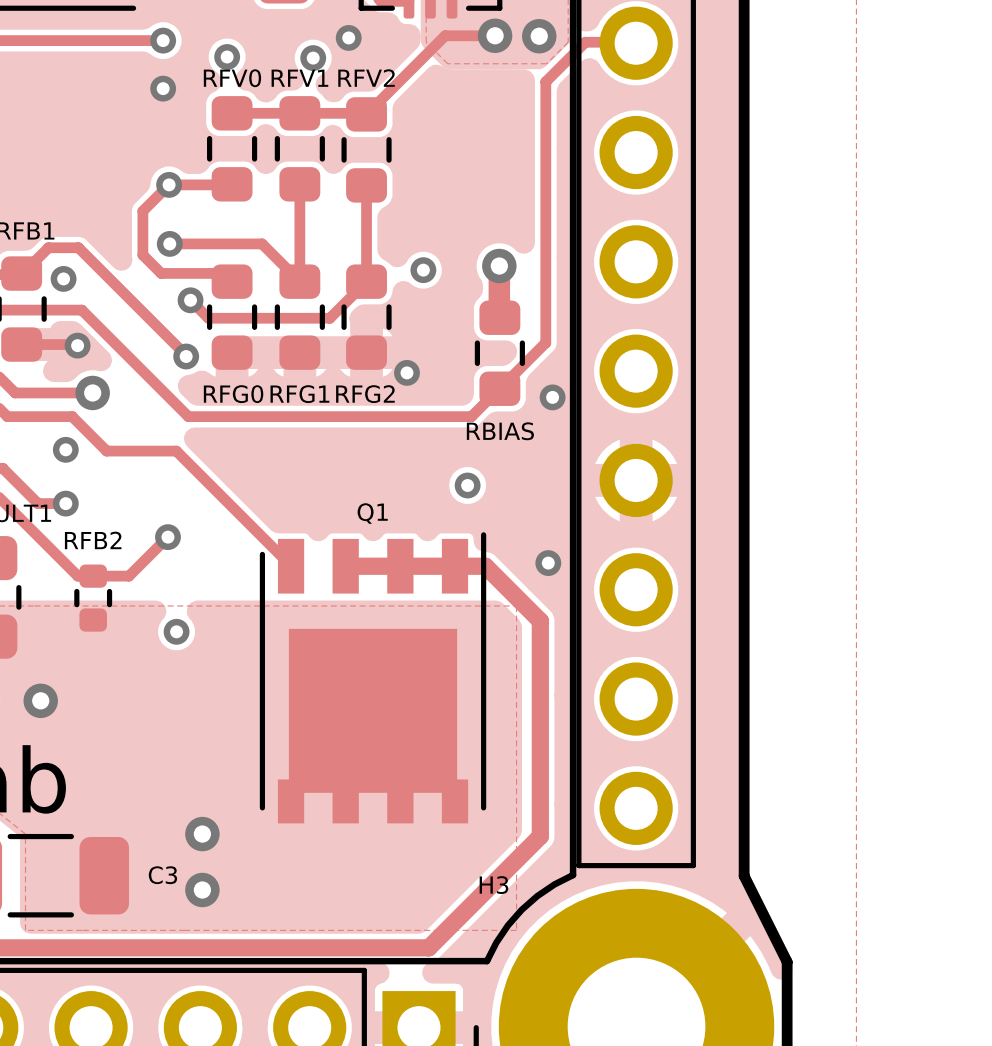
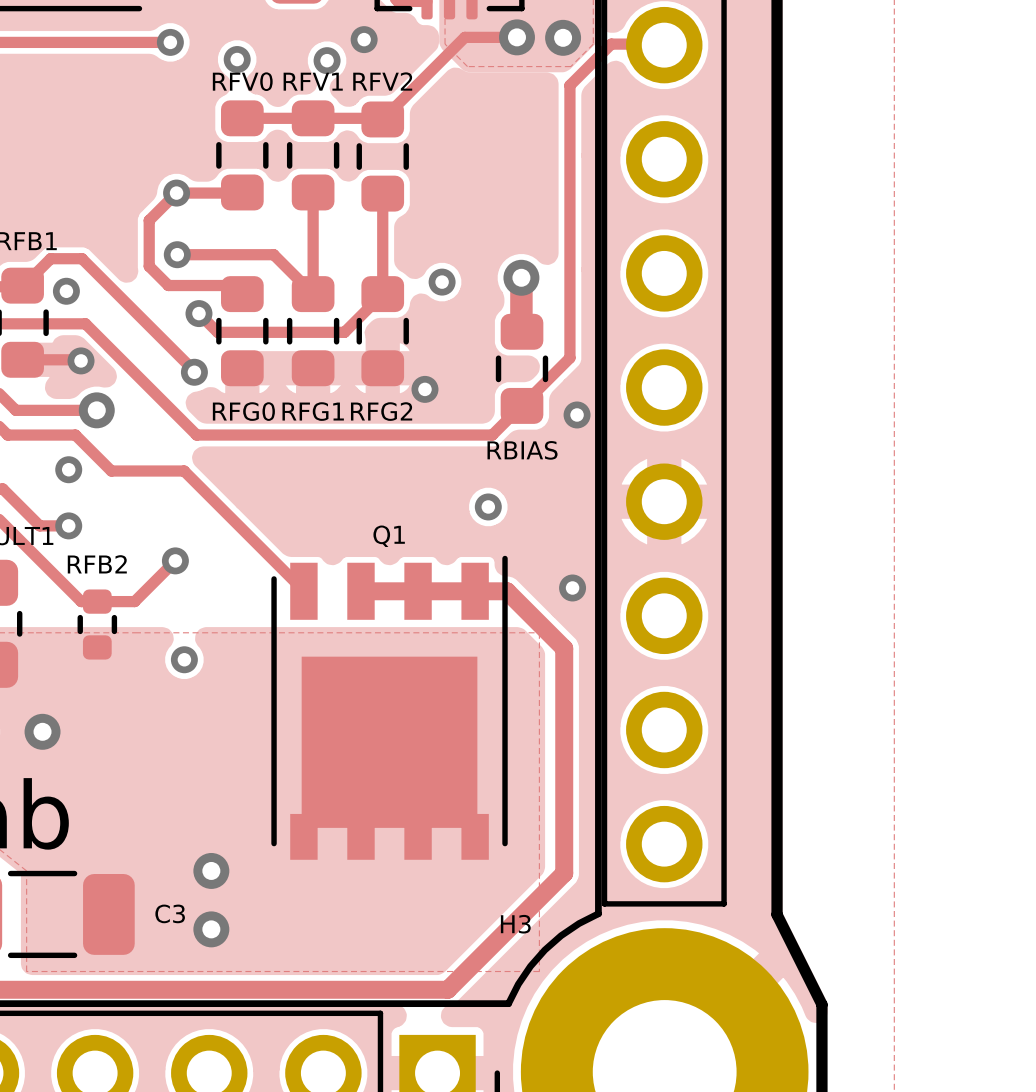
via: (163, 88) -> none

